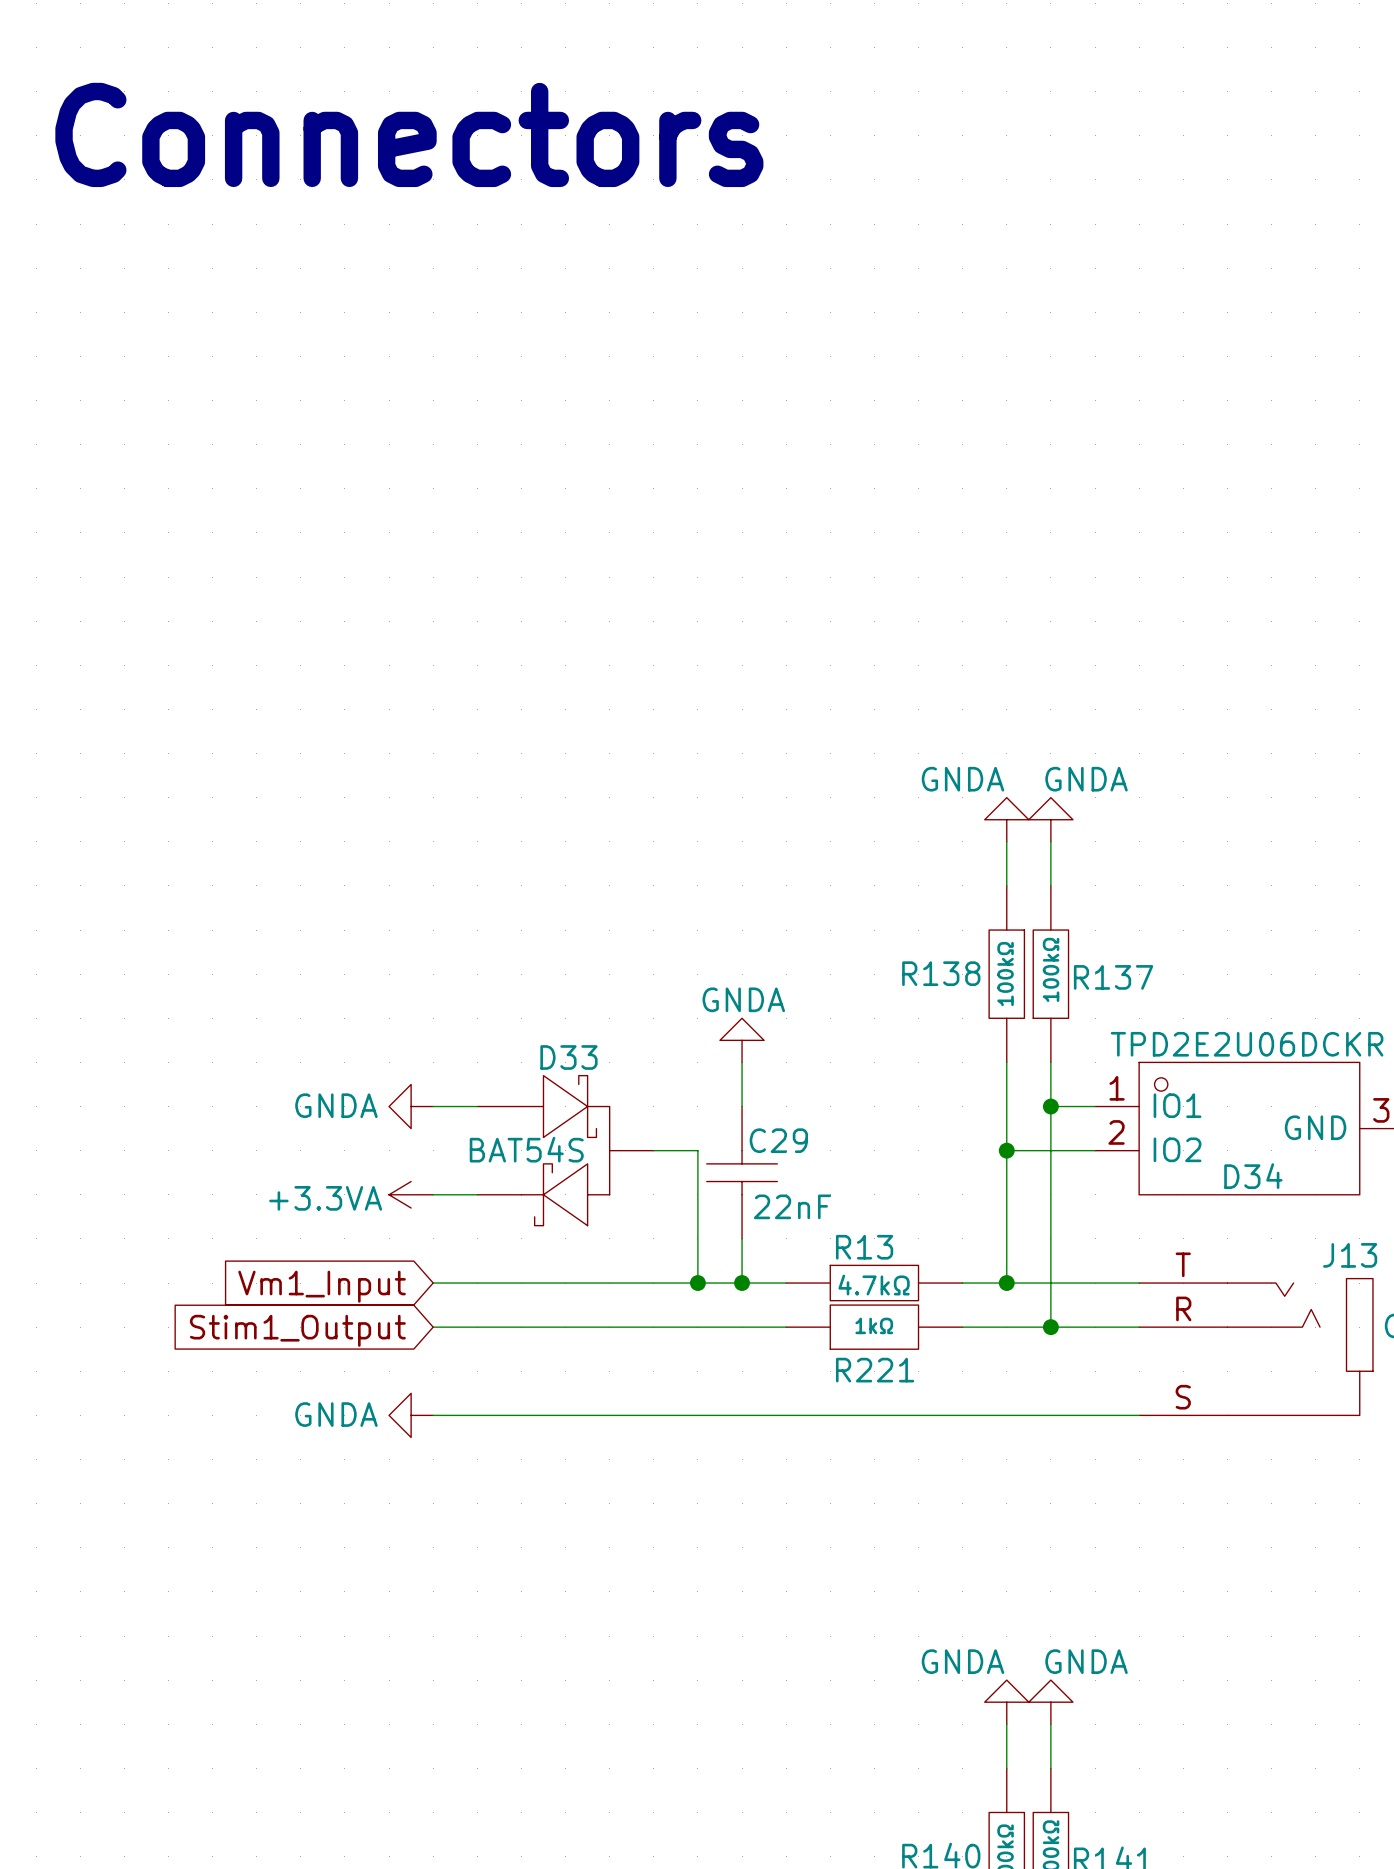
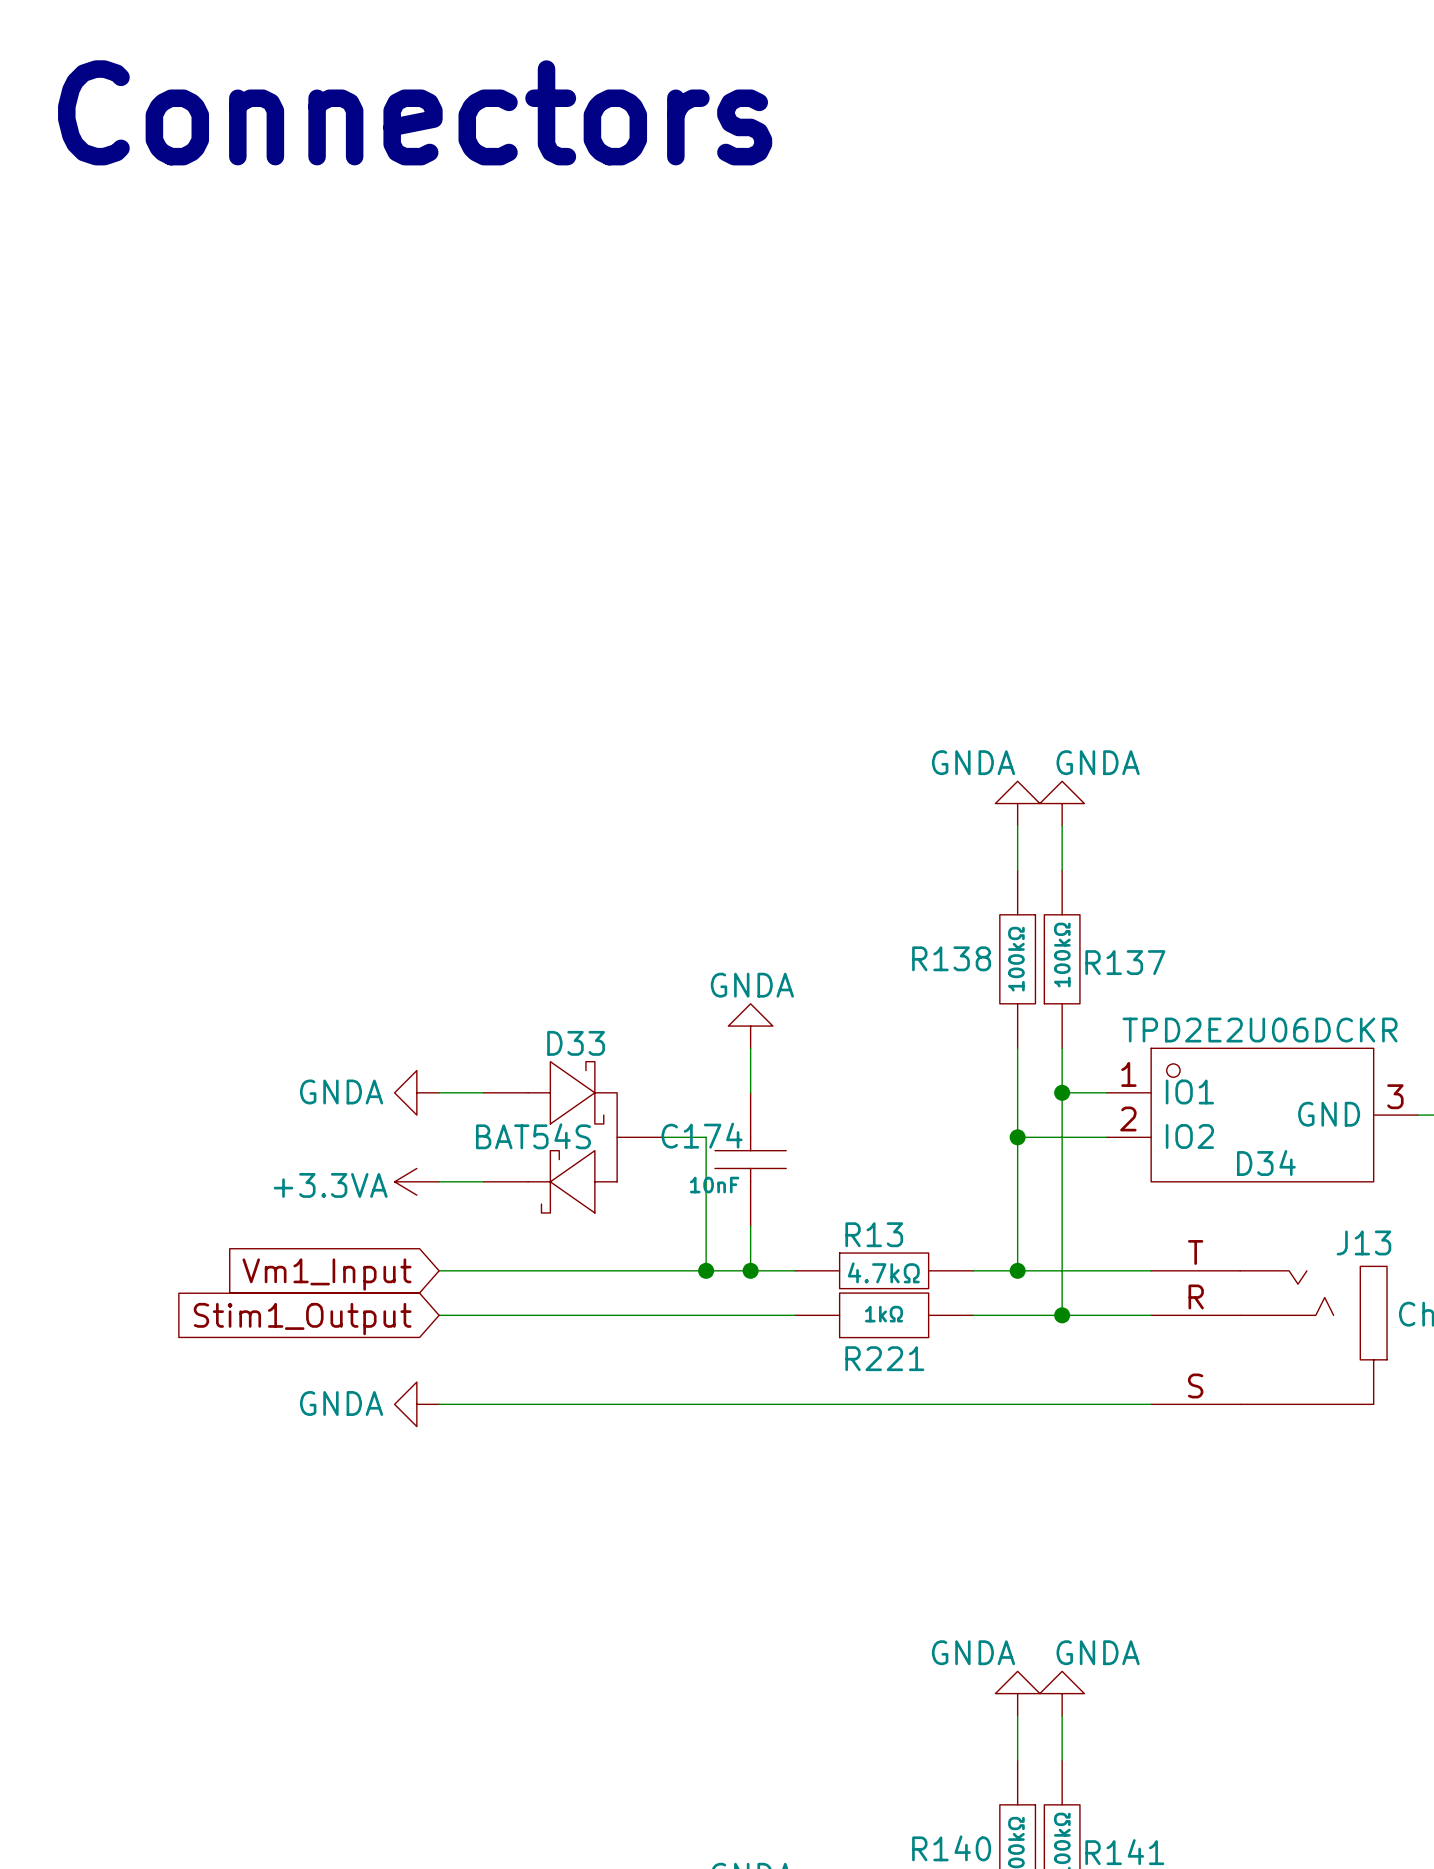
C29 name: C29 (778, 1140) -> C174 (702, 1135)
C29 value: 22nF (792, 1206) -> 10nF (714, 1185)

